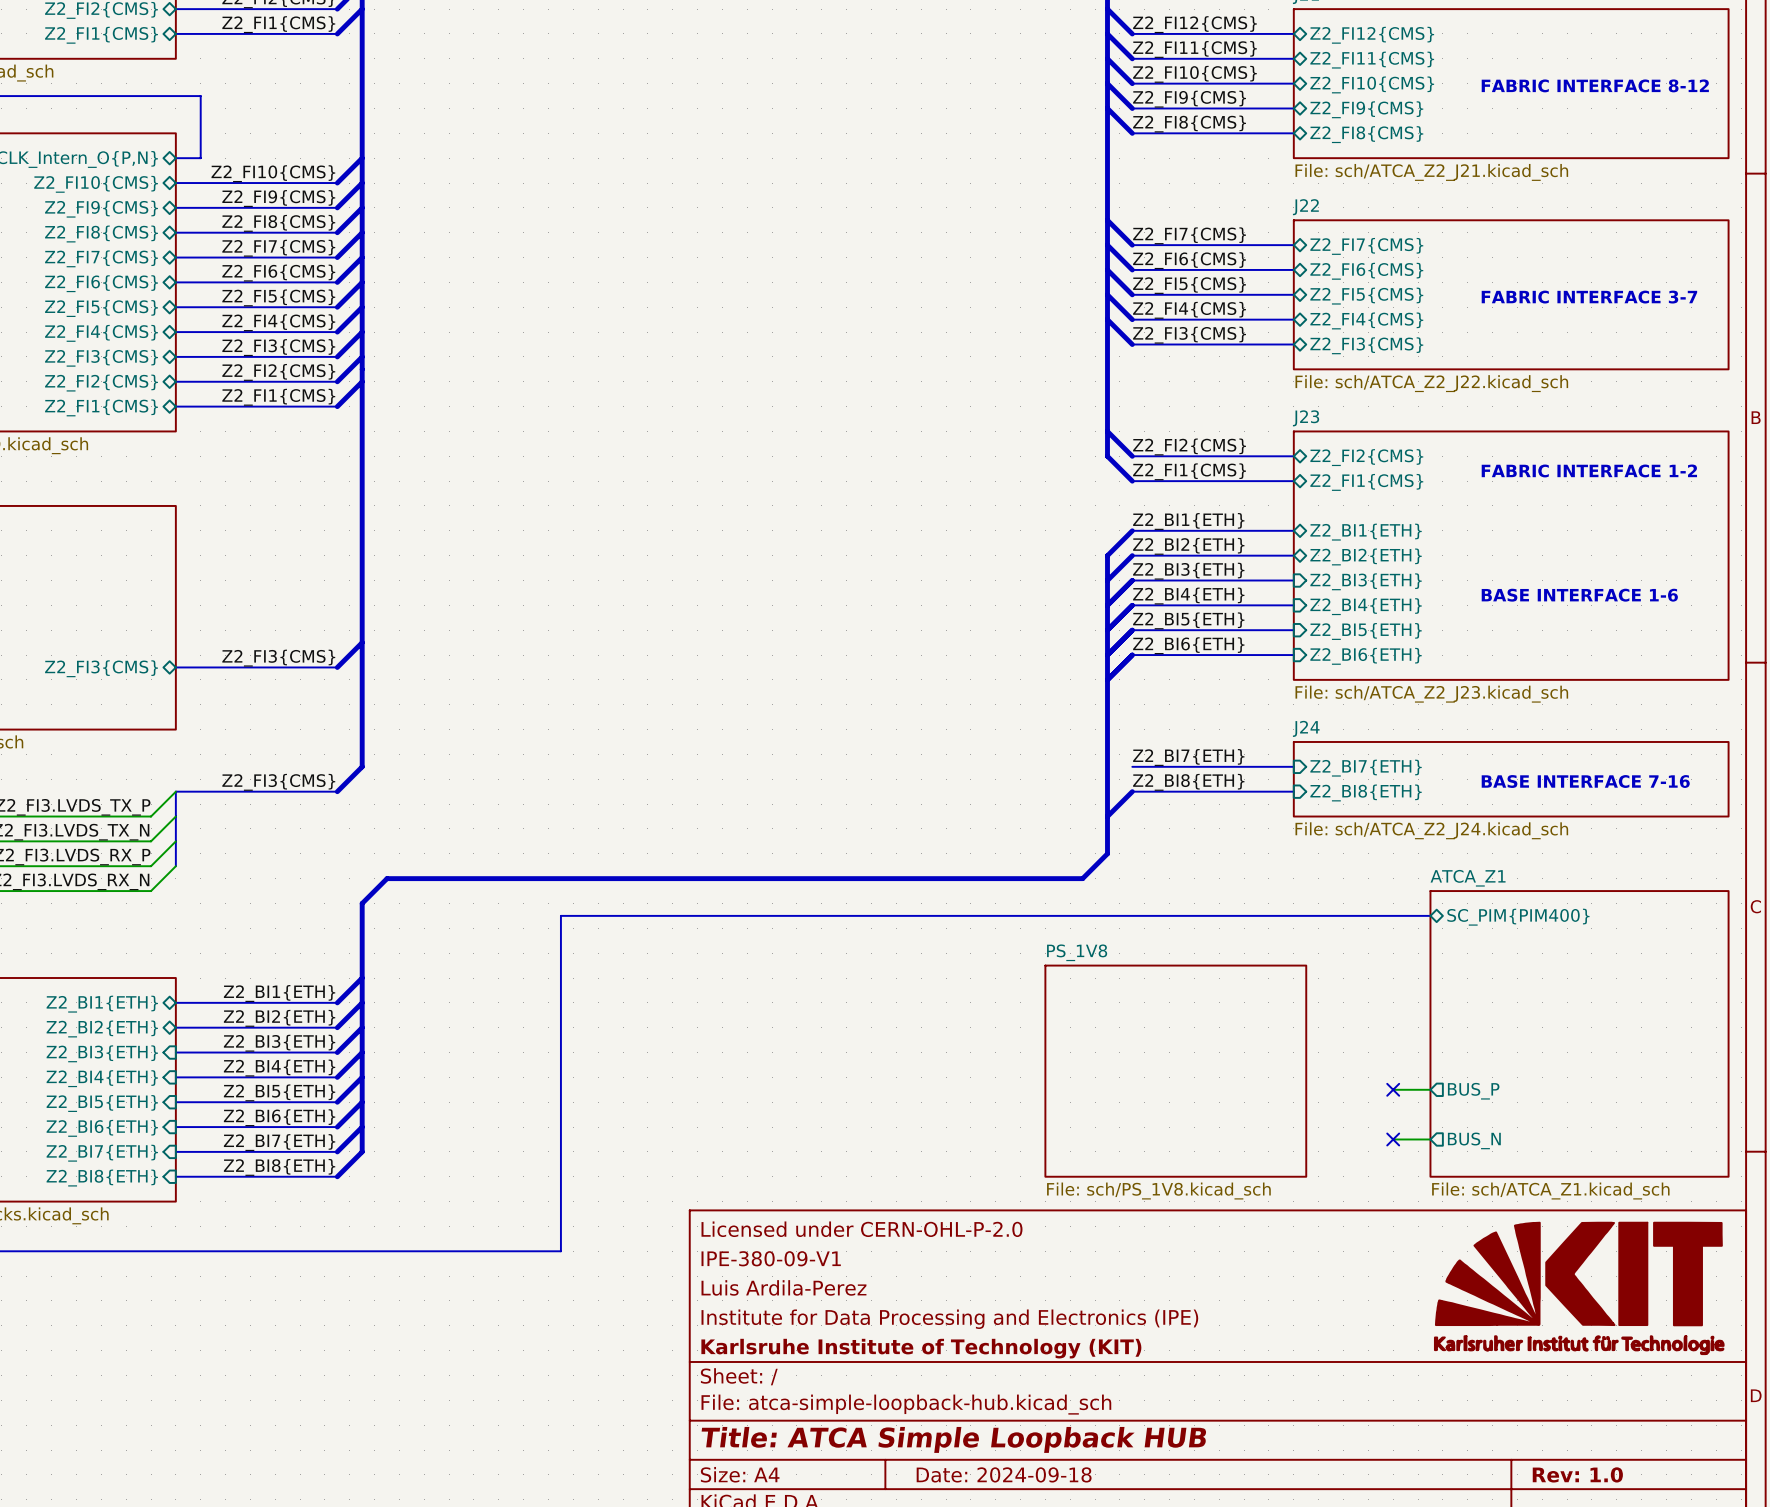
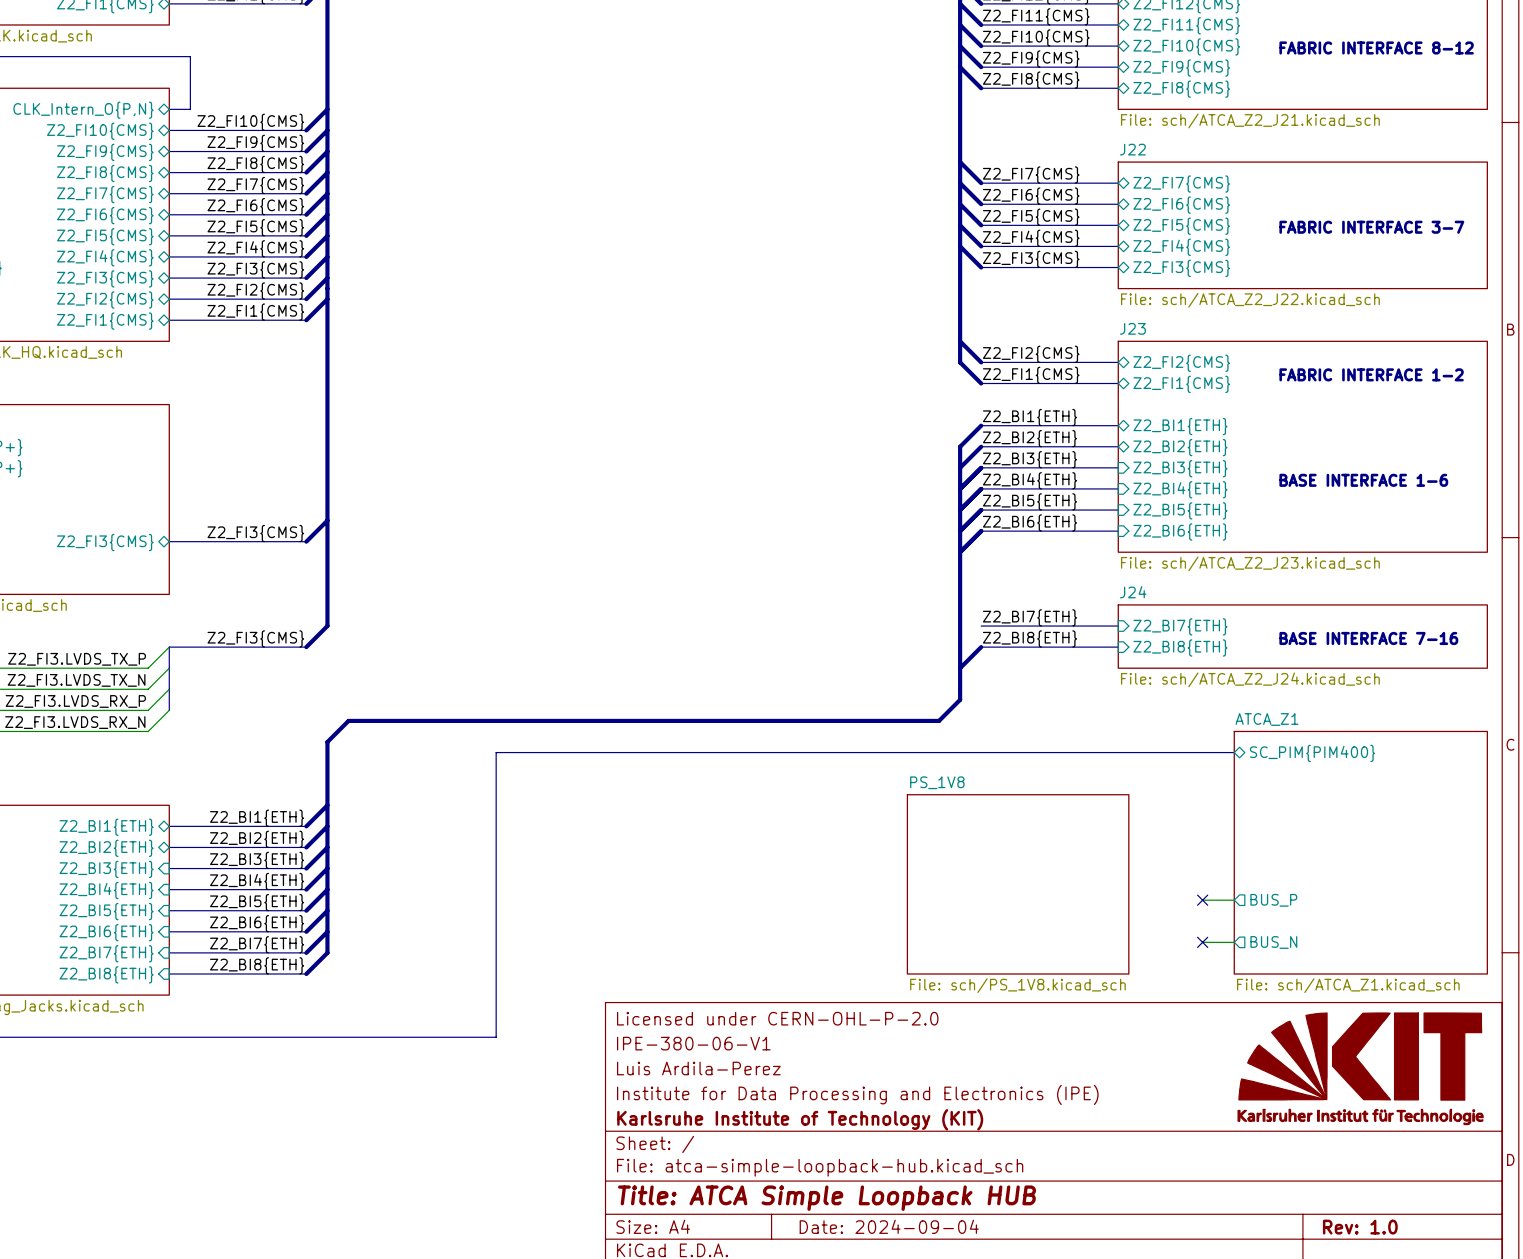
title block: IPE-380-09-V1 (771, 1258) -> IPE-380-06-V1 (693, 1043)
title block: Date: 2024-09-18 (1004, 1474) -> Date: 2024-09-04 (889, 1226)

